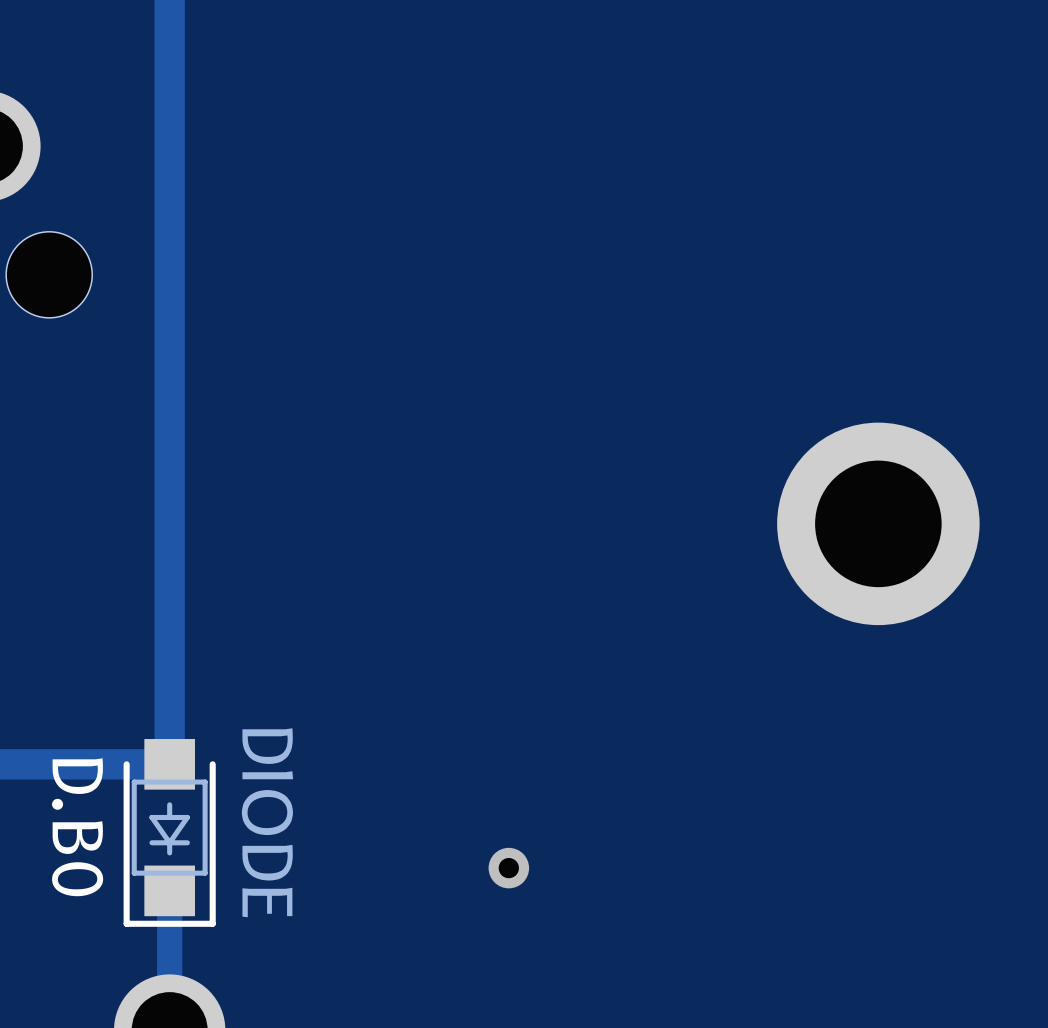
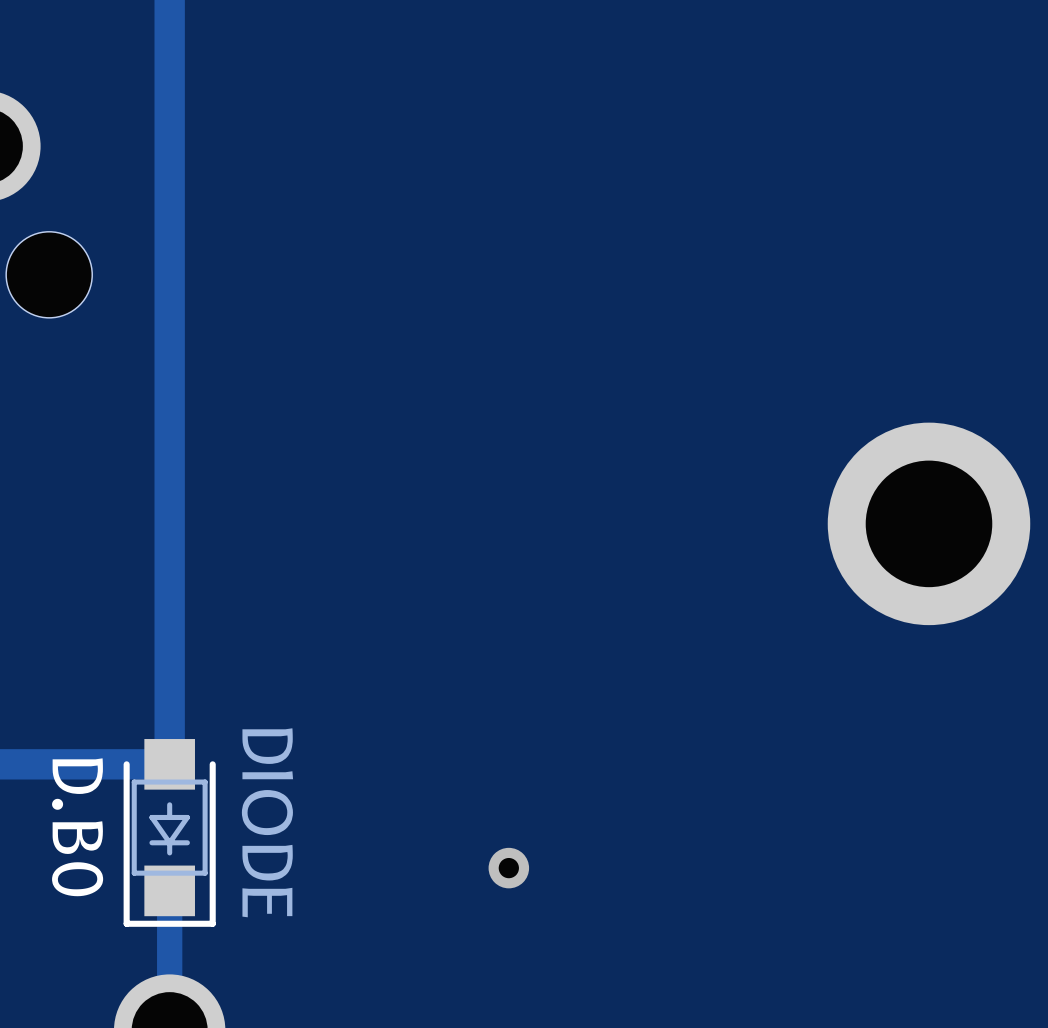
part position: (878, 523) -> (928, 523)

